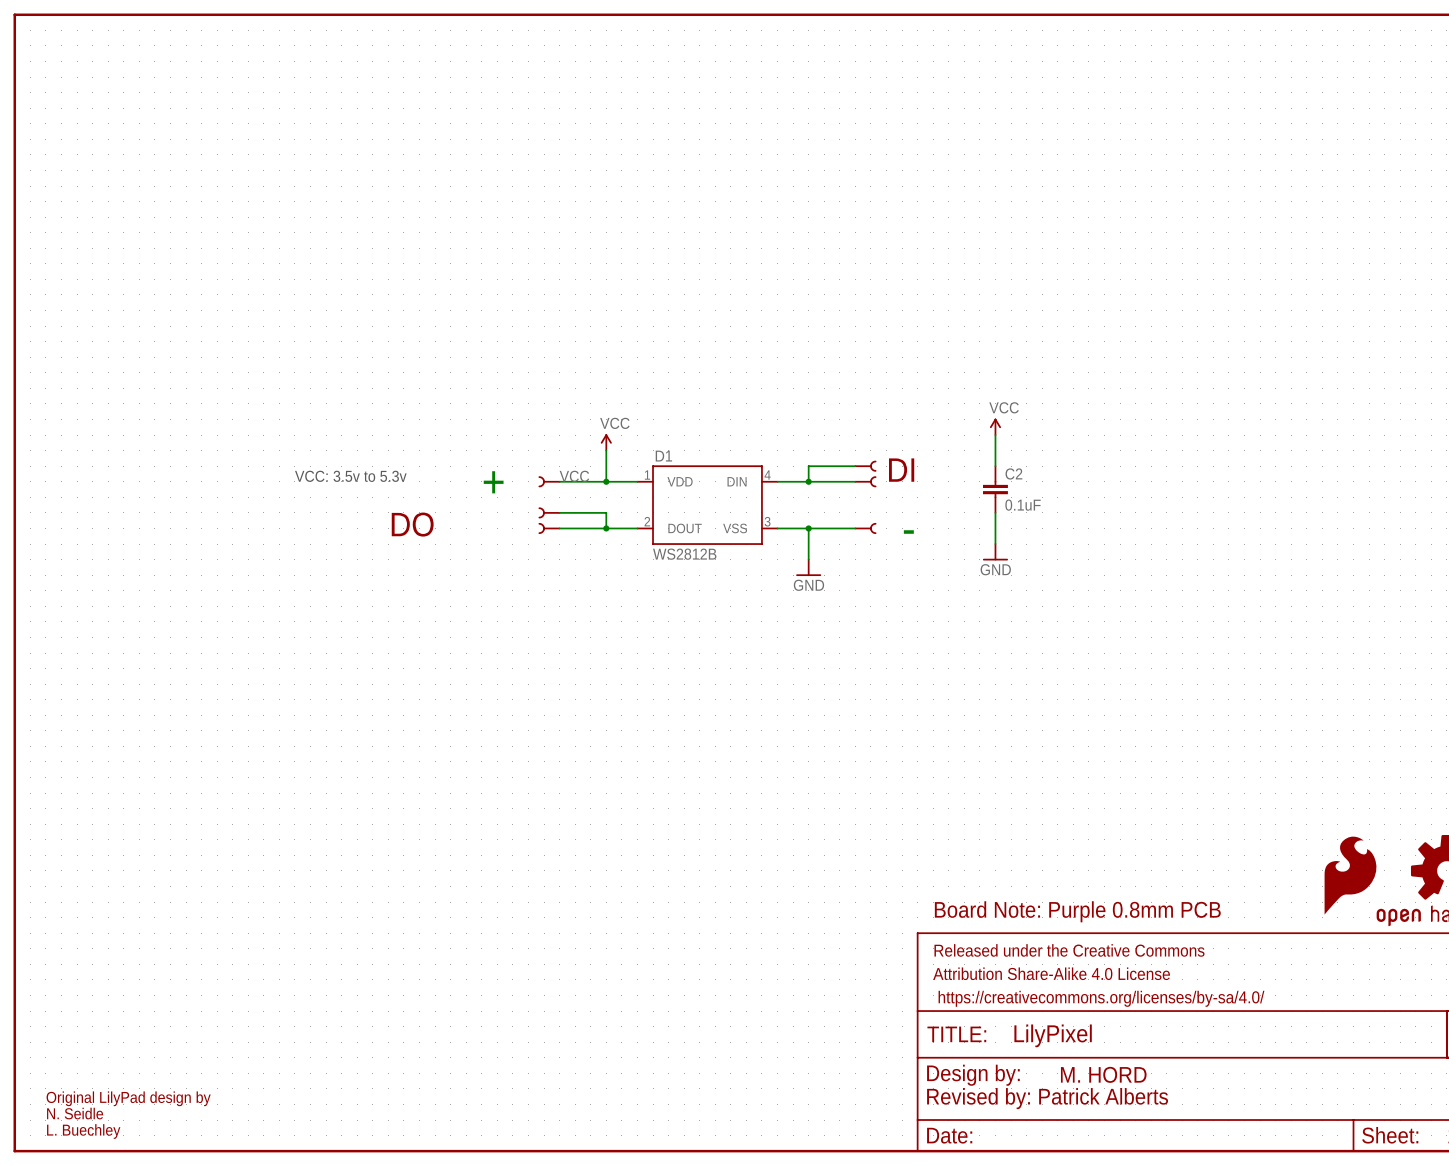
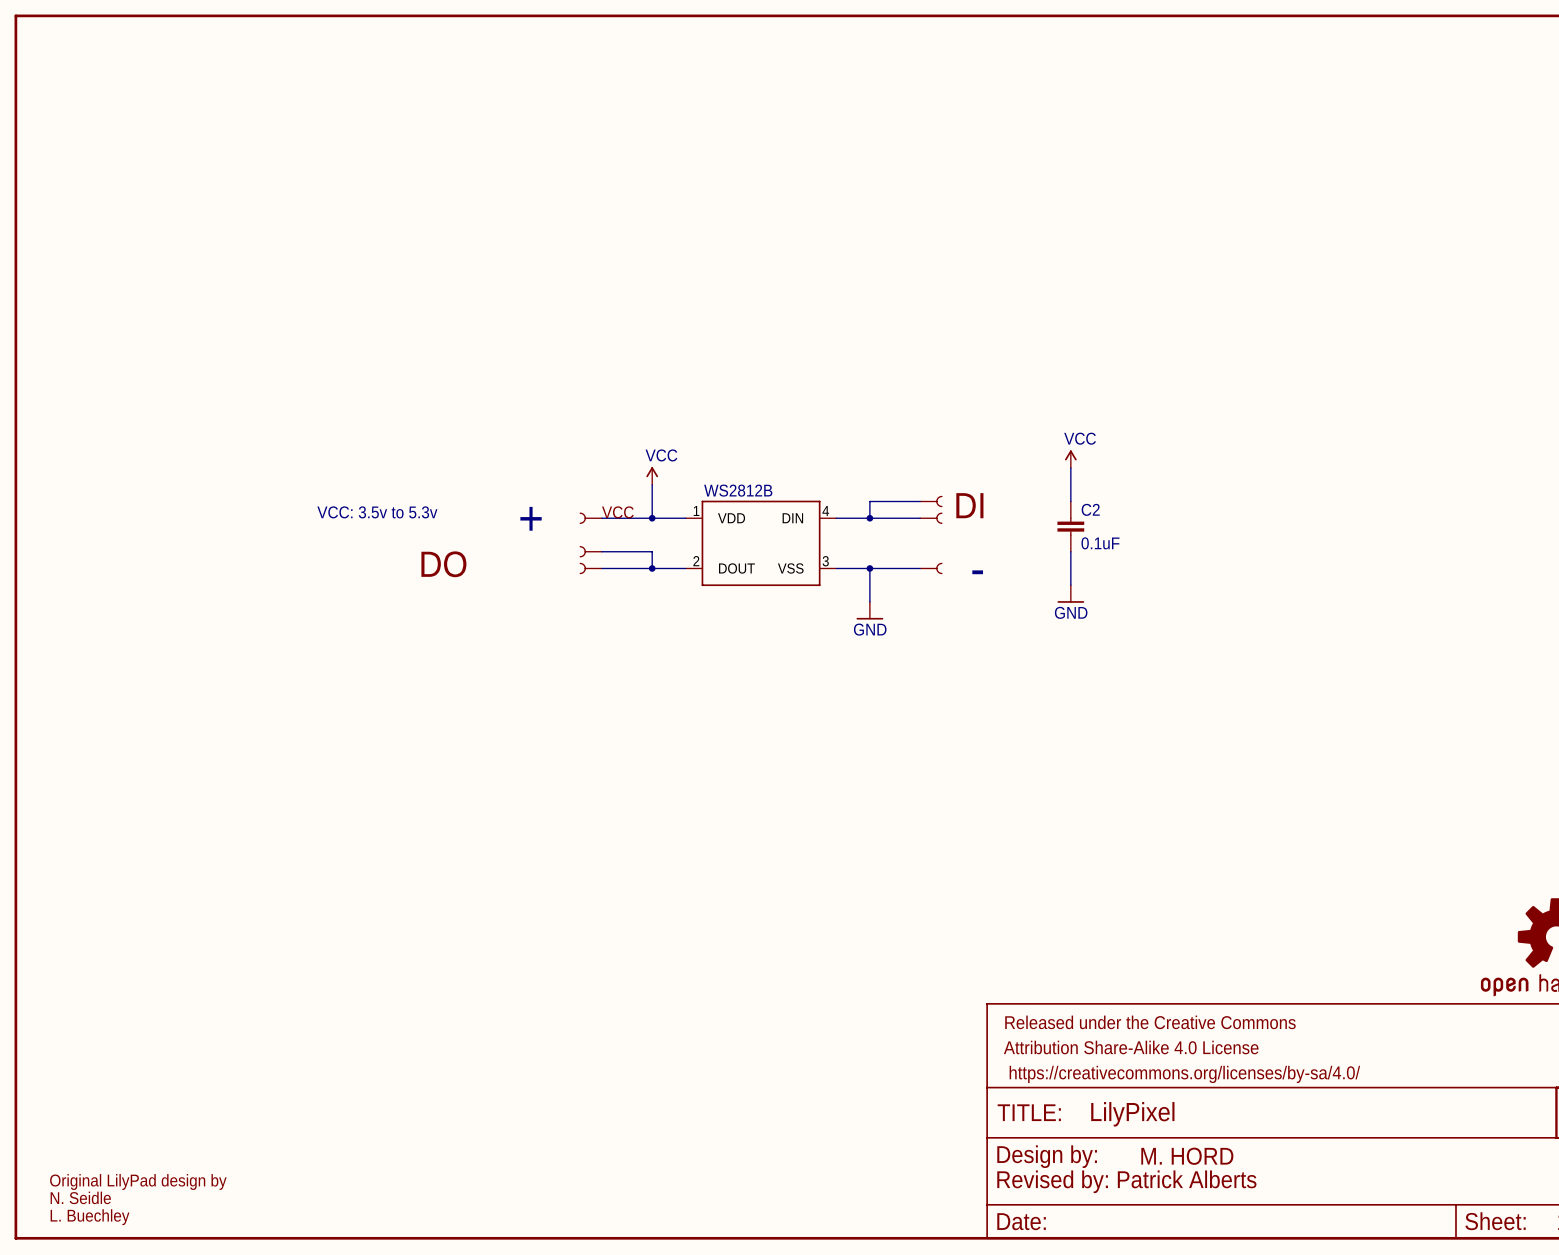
D1 name: D1 (663, 456) -> WS2812B (738, 490)
D1 value: WS2812B (684, 554) -> none
part: (1350, 875) -> none
text: Board Note: Purple 0.8mm PCB (1077, 911) -> none

